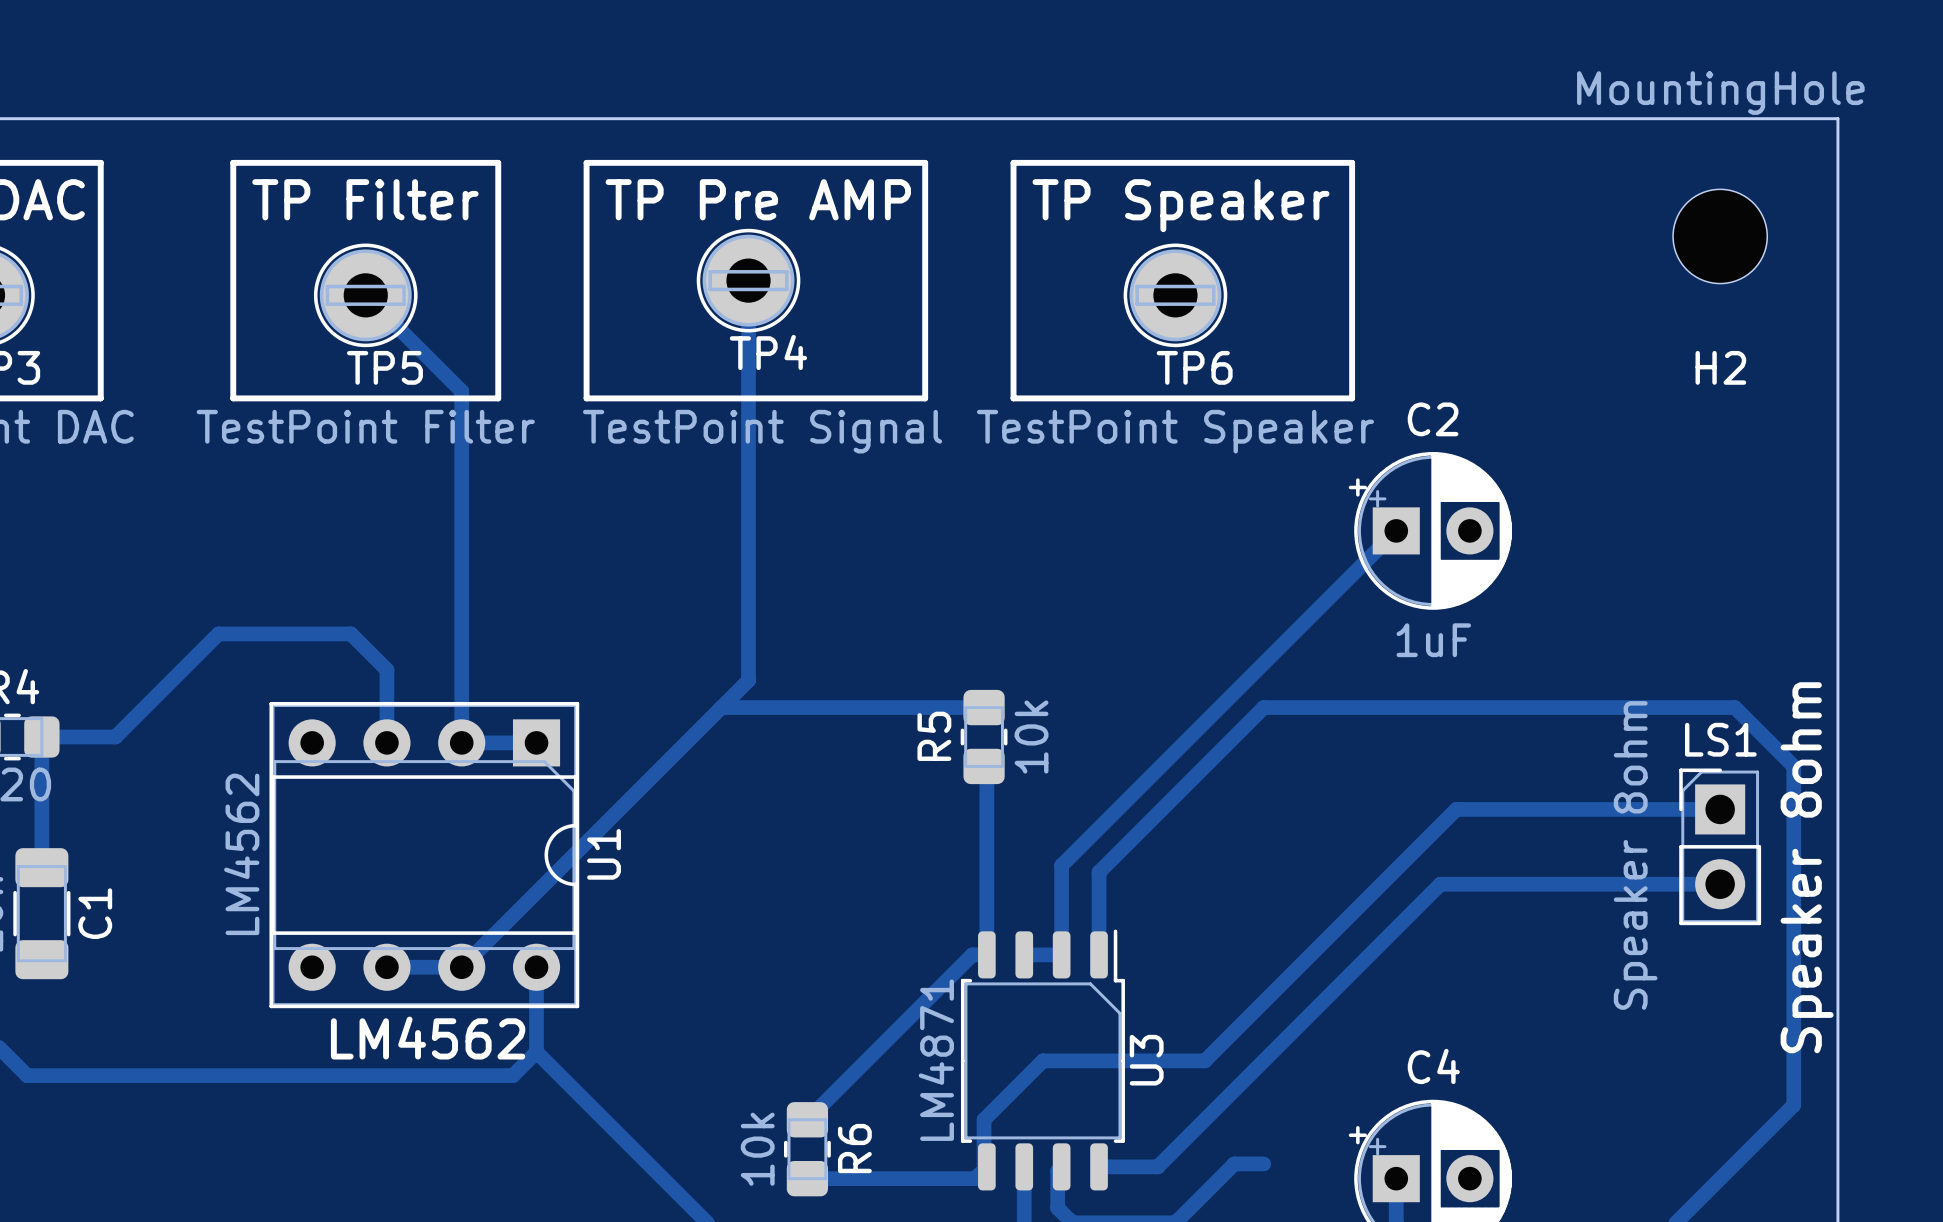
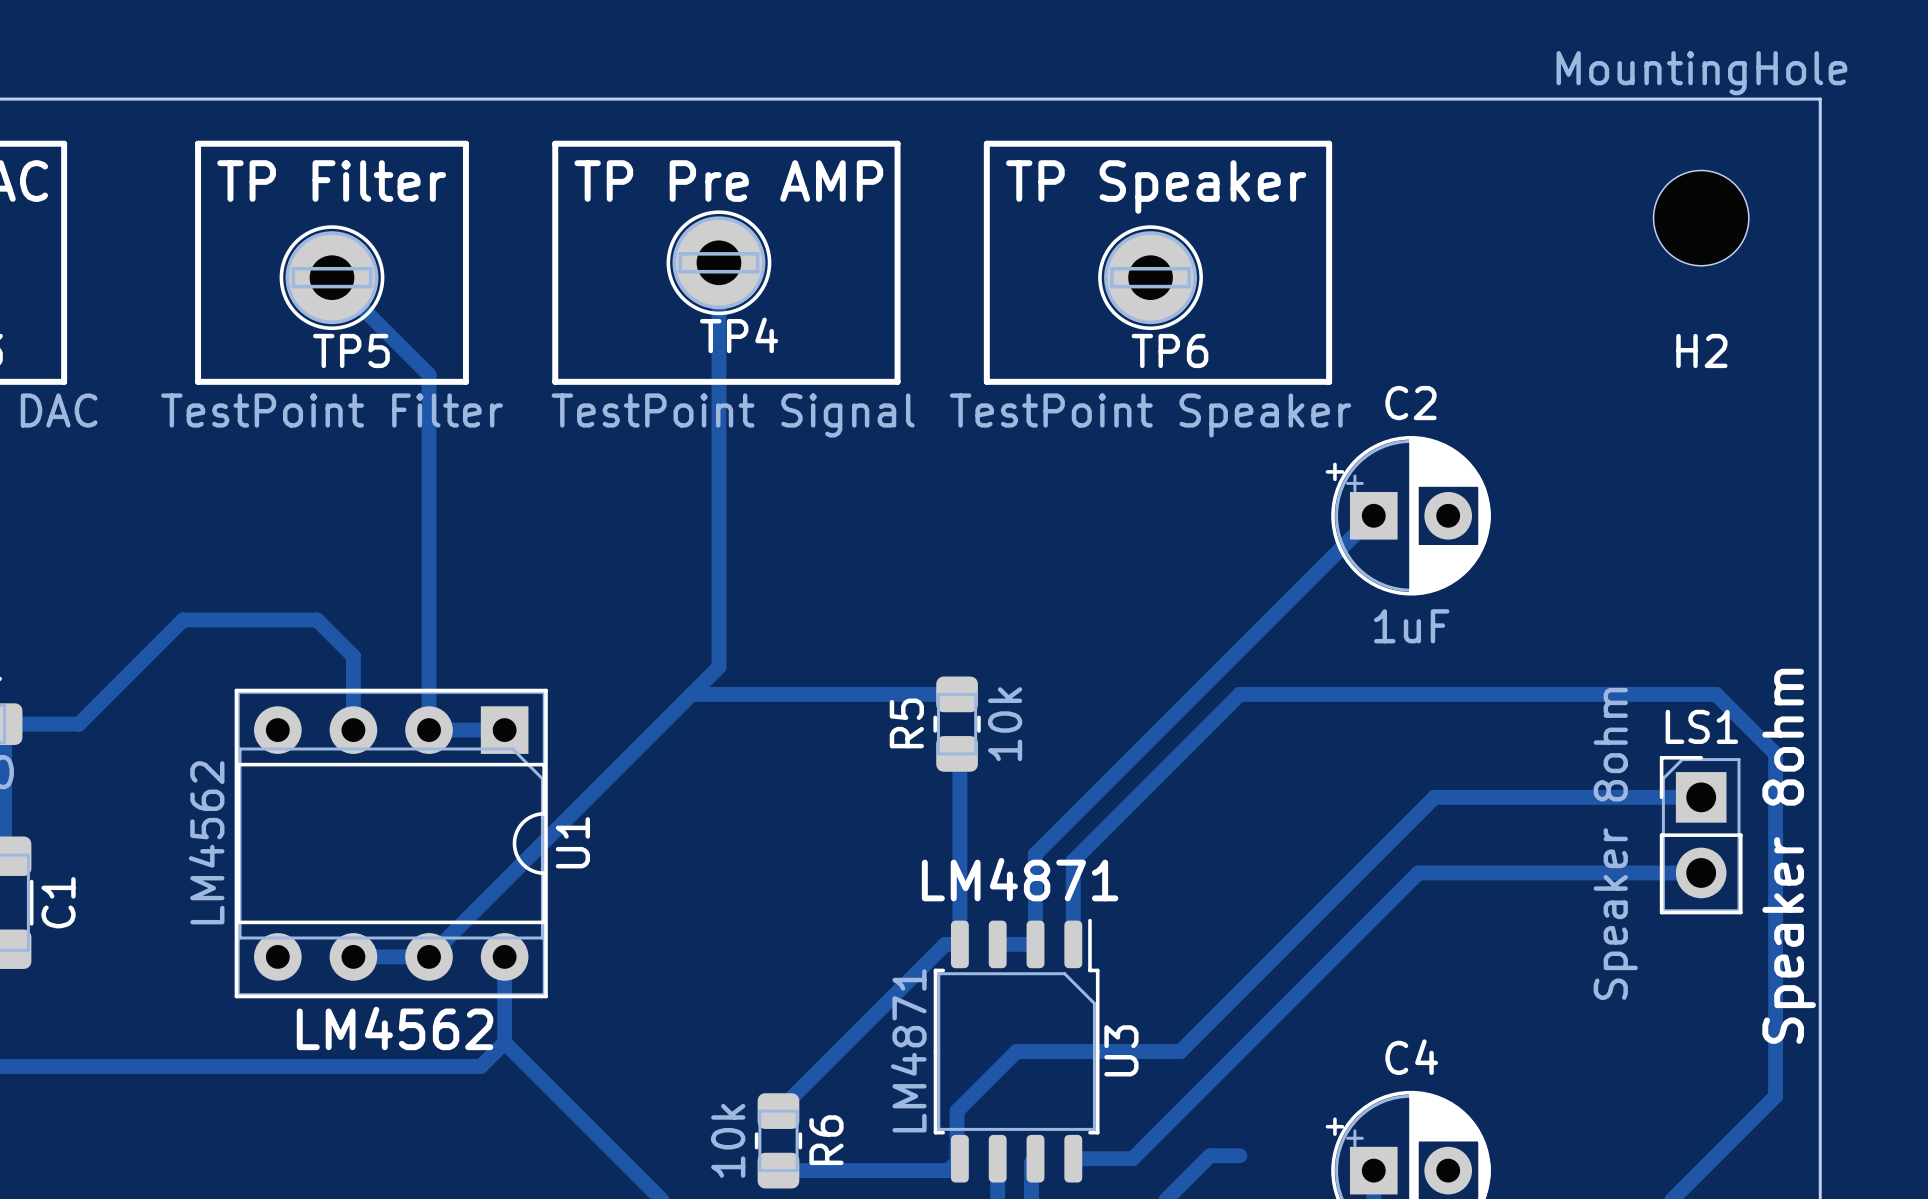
text: none -> LM4871 (1020, 879)

